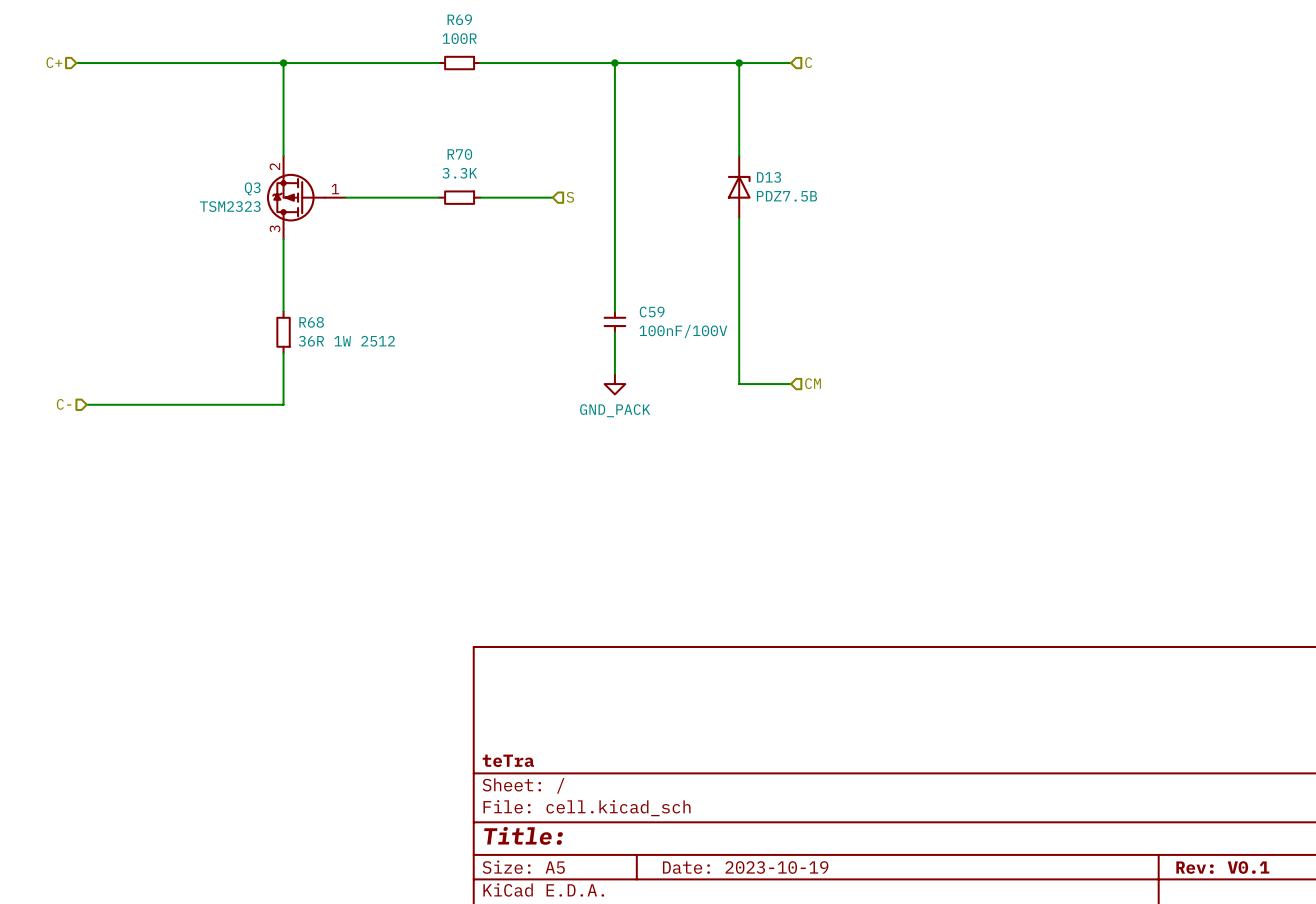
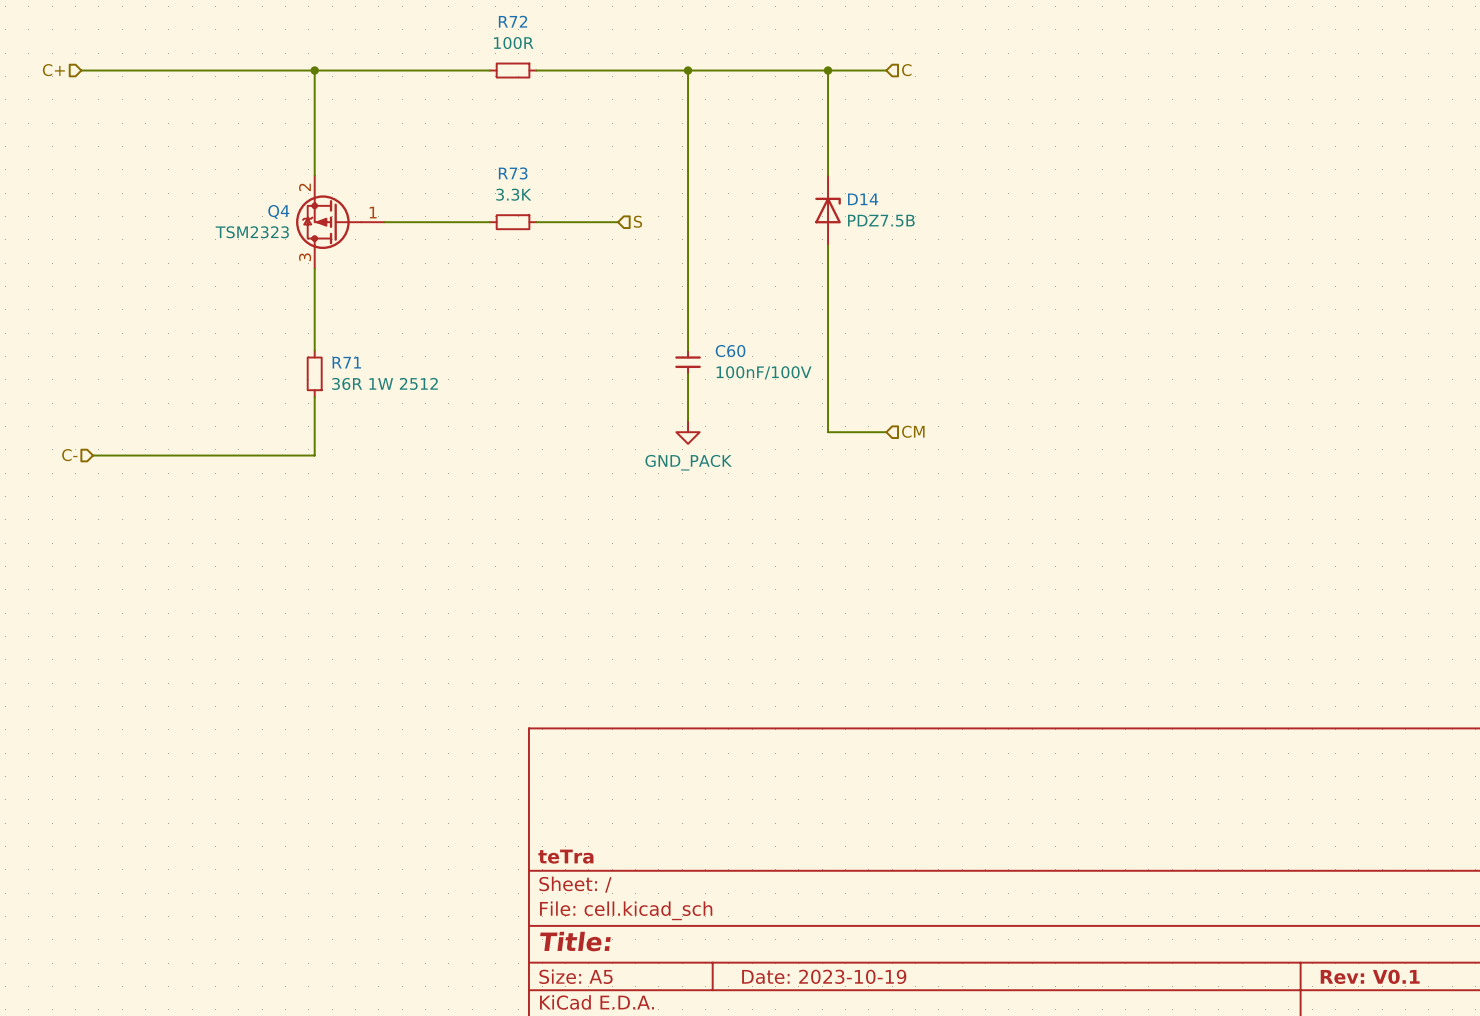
R69 name: R69 (459, 19) -> R72 (513, 21)
R70 name: R70 (459, 154) -> R73 (513, 173)
D13 name: D13 (769, 177) -> D14 (863, 199)
Q3 name: Q3 (252, 188) -> Q4 (278, 211)
C59 name: C59 (652, 312) -> C60 (730, 351)
R68 name: R68 (311, 322) -> R71 (346, 362)

